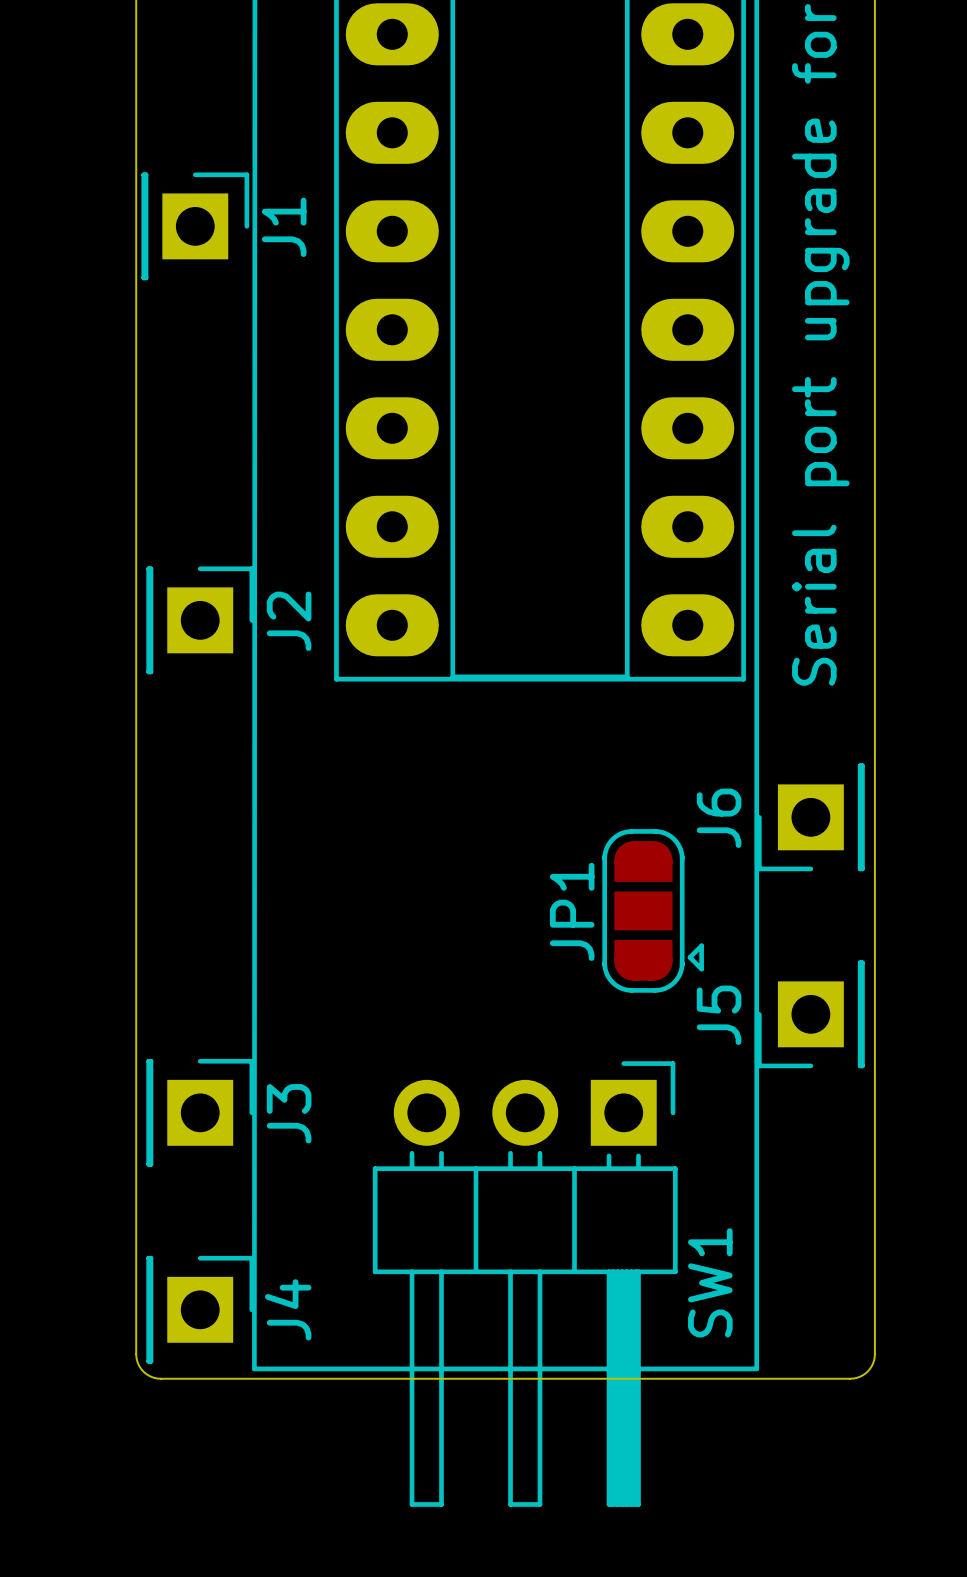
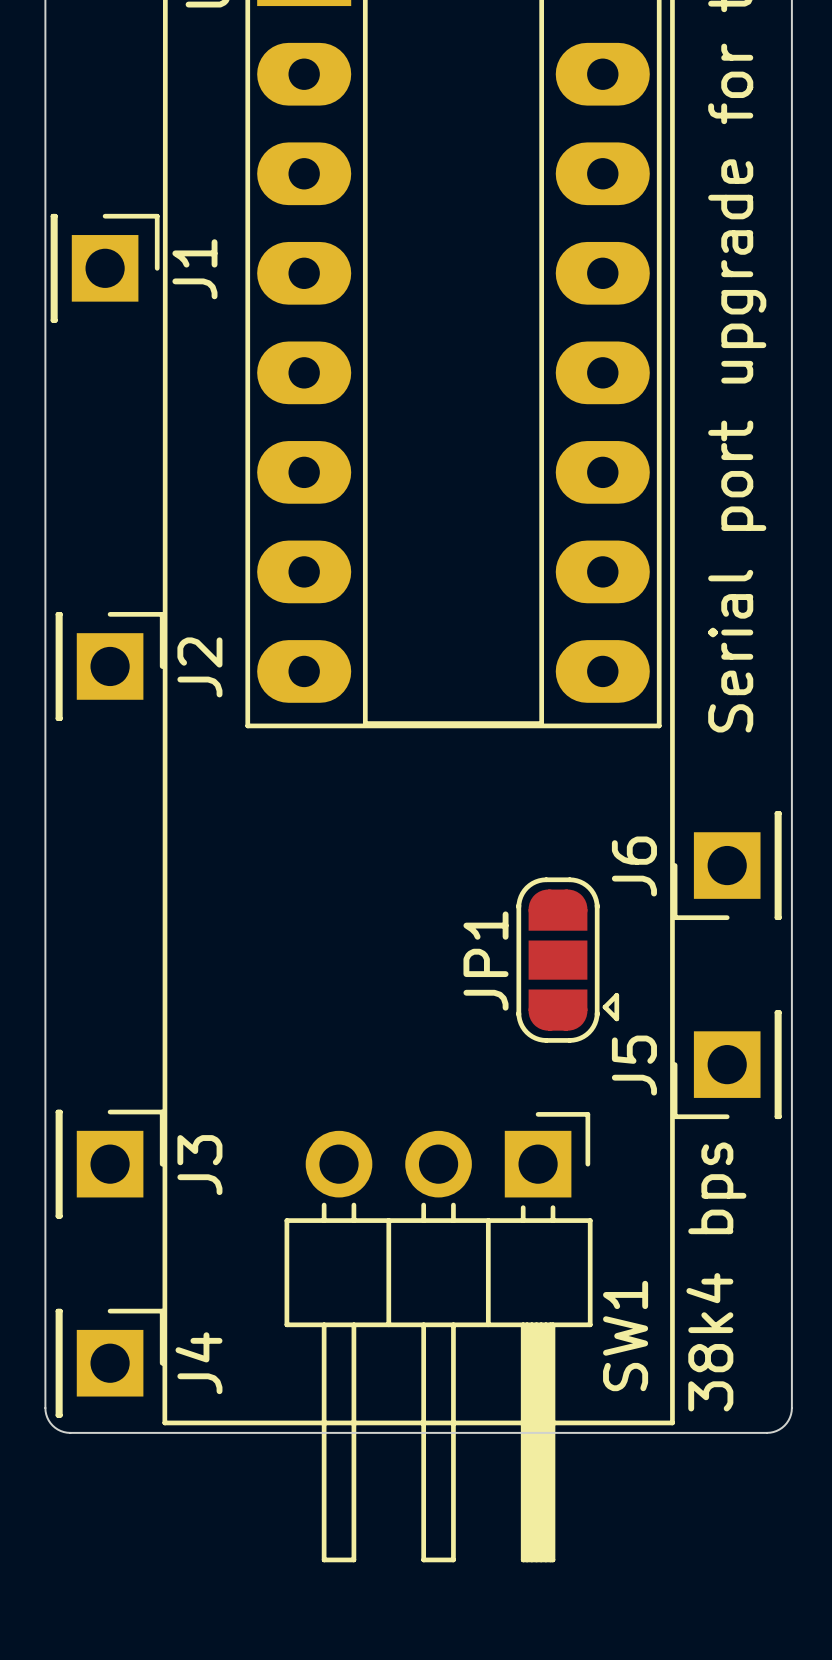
text: none -> 38k4 bps (716, 1276)

